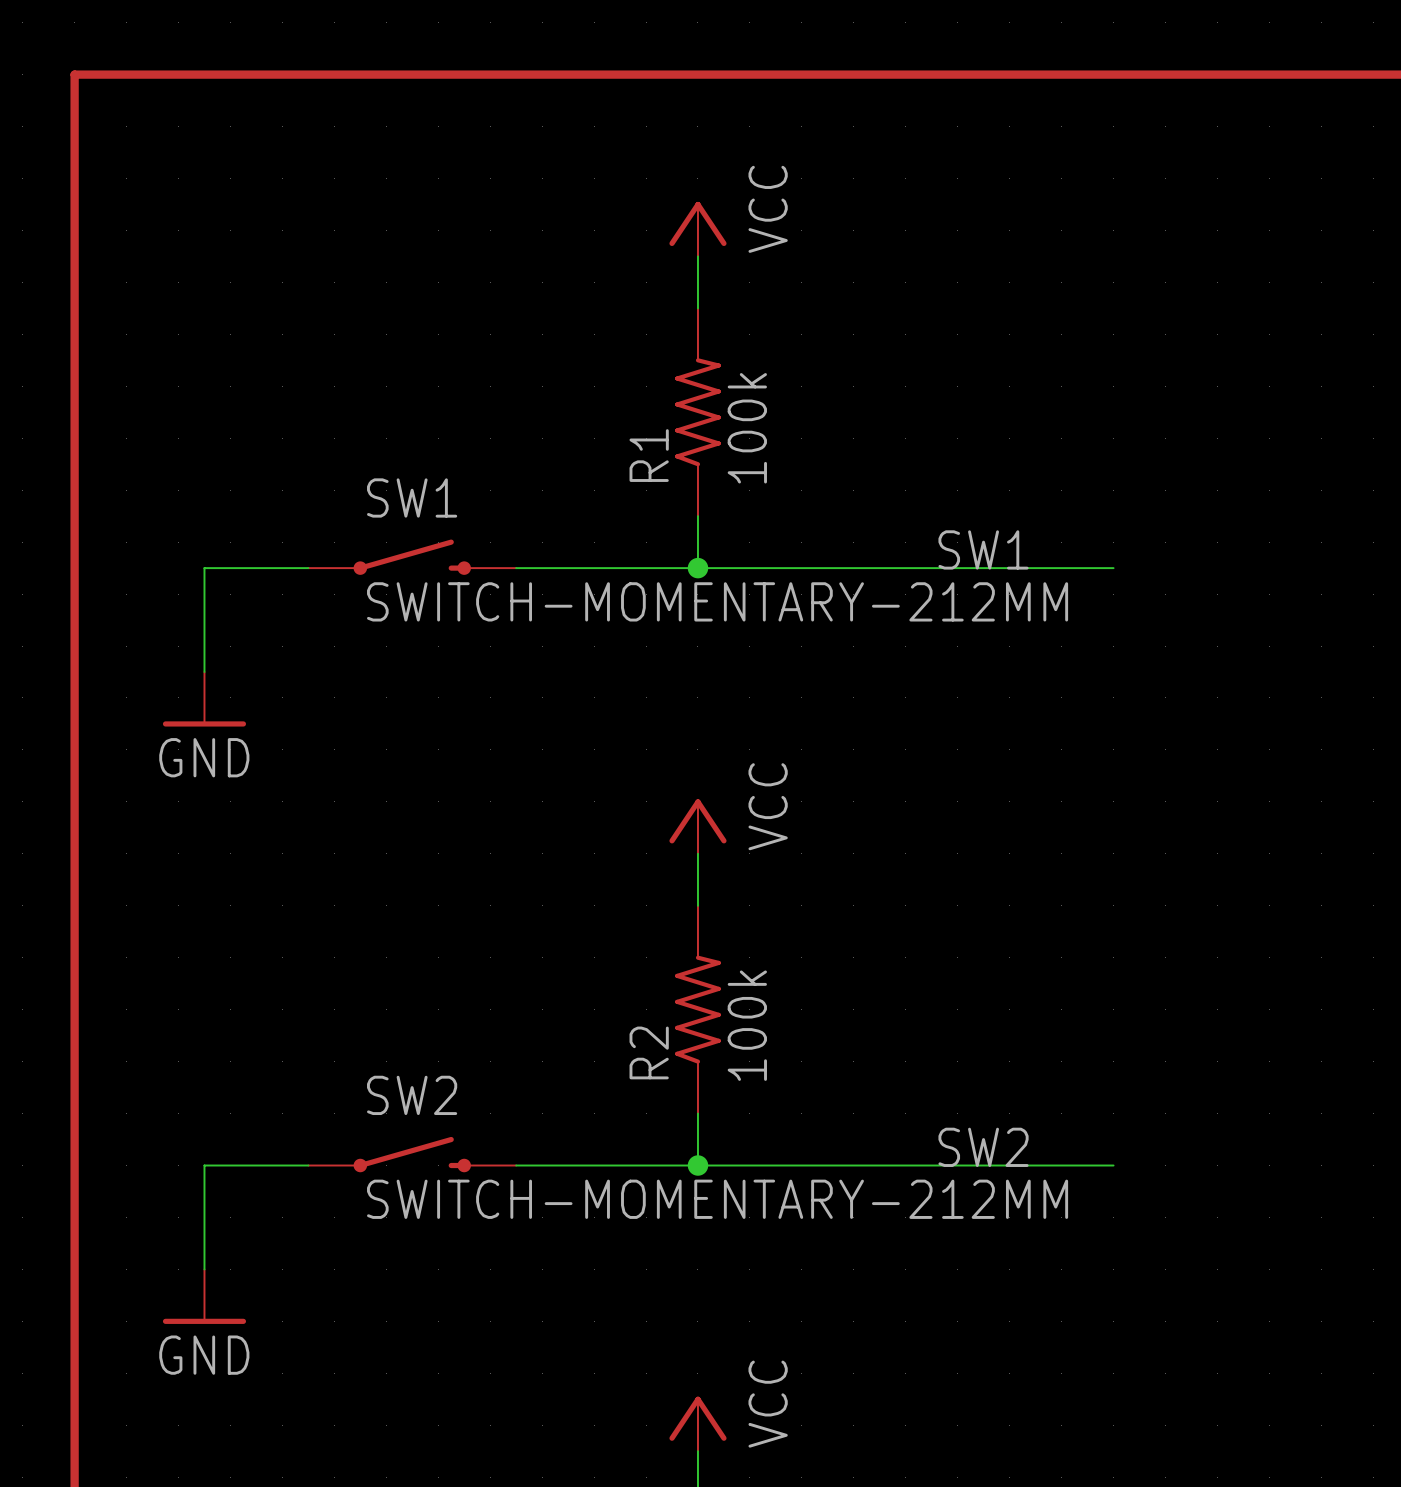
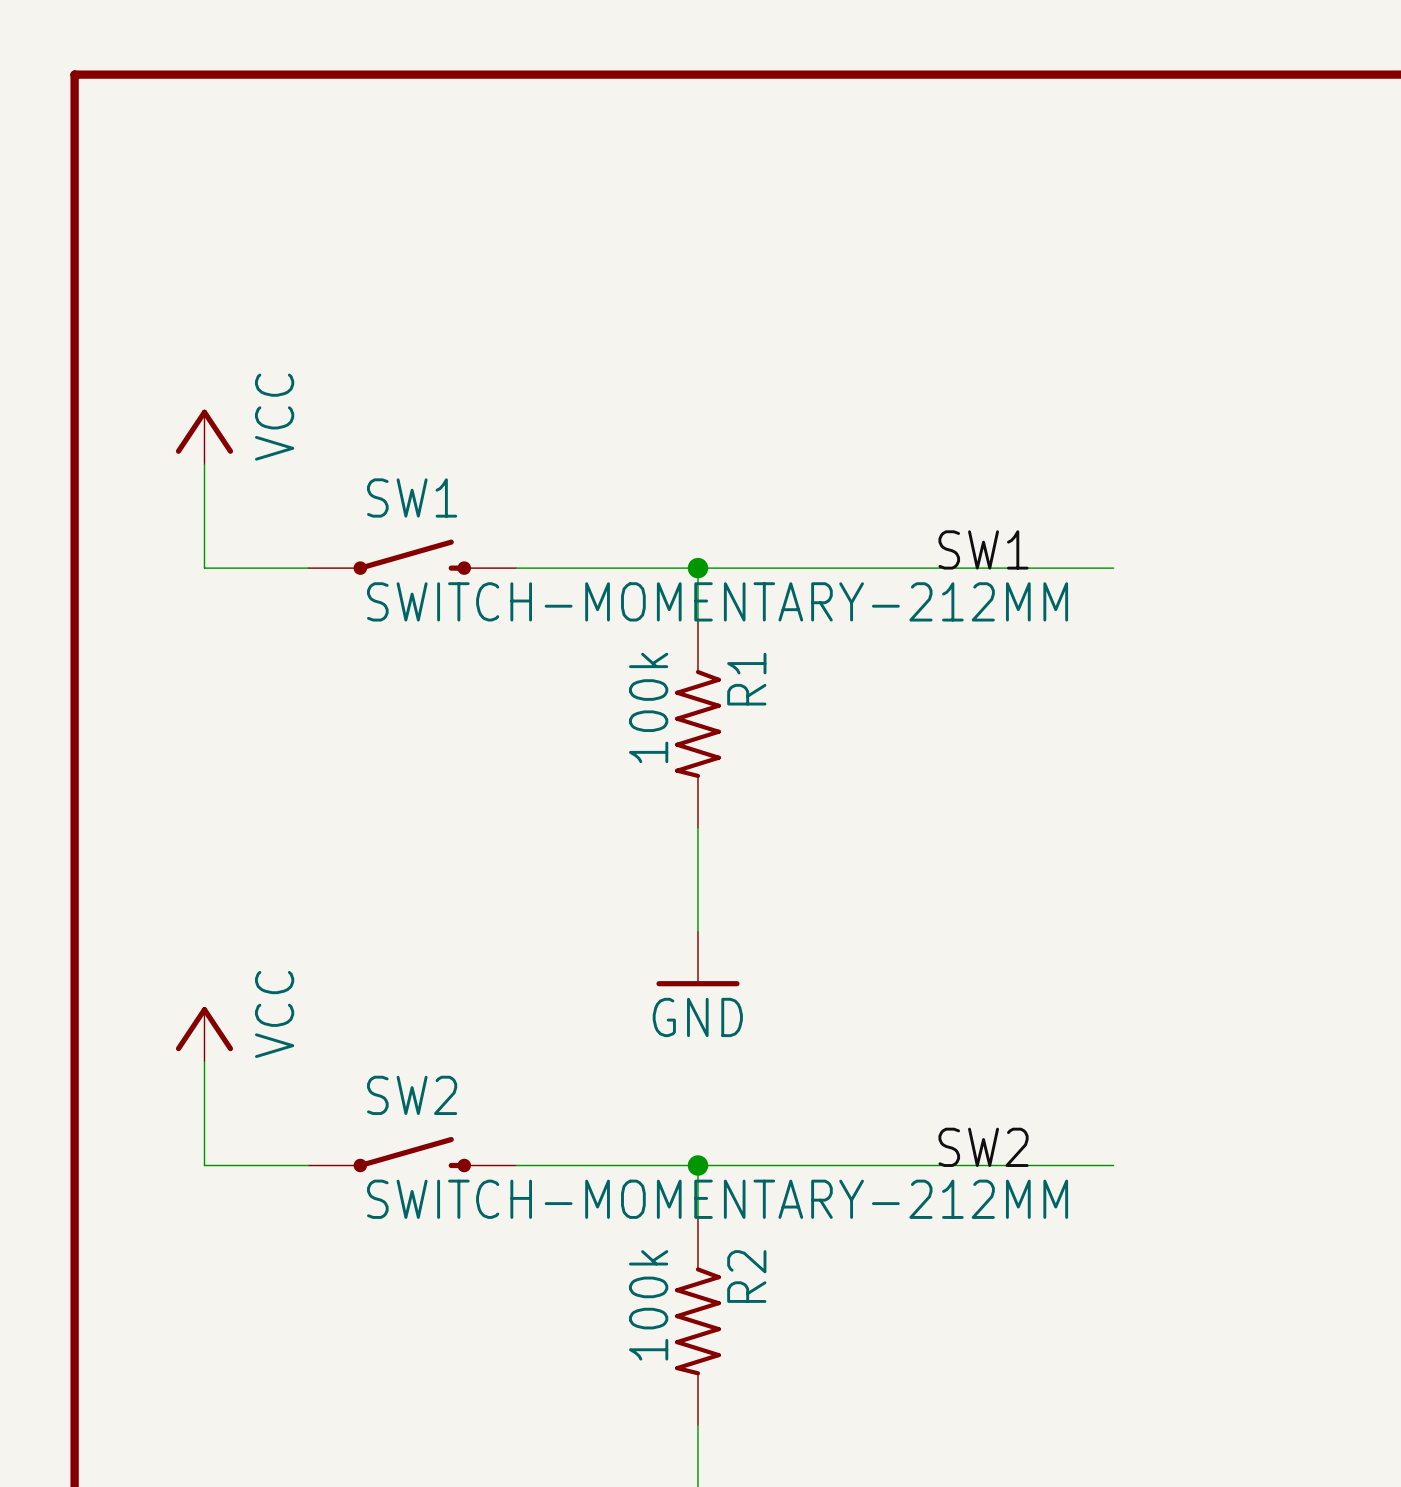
power symbol: VCC (697, 229) -> none
wire: (697, 256) (697, 308) -> none
R1 rotation: 0° (697, 412) -> 180° (697, 723)
R1 position: (697, 412) -> (697, 723)
power symbol: none -> VCC (204, 436)
wire: (697, 516) (697, 568) -> (697, 620) (697, 568)
wire: (204, 568) (204, 672) -> (204, 568) (204, 464)
power symbol: GND (204, 699) -> none
power symbol: VCC (697, 826) -> none
power symbol: none -> GND (697, 959)
R2 rotation: 0° (697, 1009) -> 180° (697, 1321)
R2 position: (697, 1009) -> (697, 1321)
power symbol: none -> VCC (204, 1034)
wire: (697, 1113) (697, 1165) -> (697, 1217) (697, 1165)
wire: (204, 1165) (204, 1269) -> (204, 1165) (204, 1061)
power symbol: GND (204, 1296) -> none
power symbol: VCC (697, 1423) -> none

